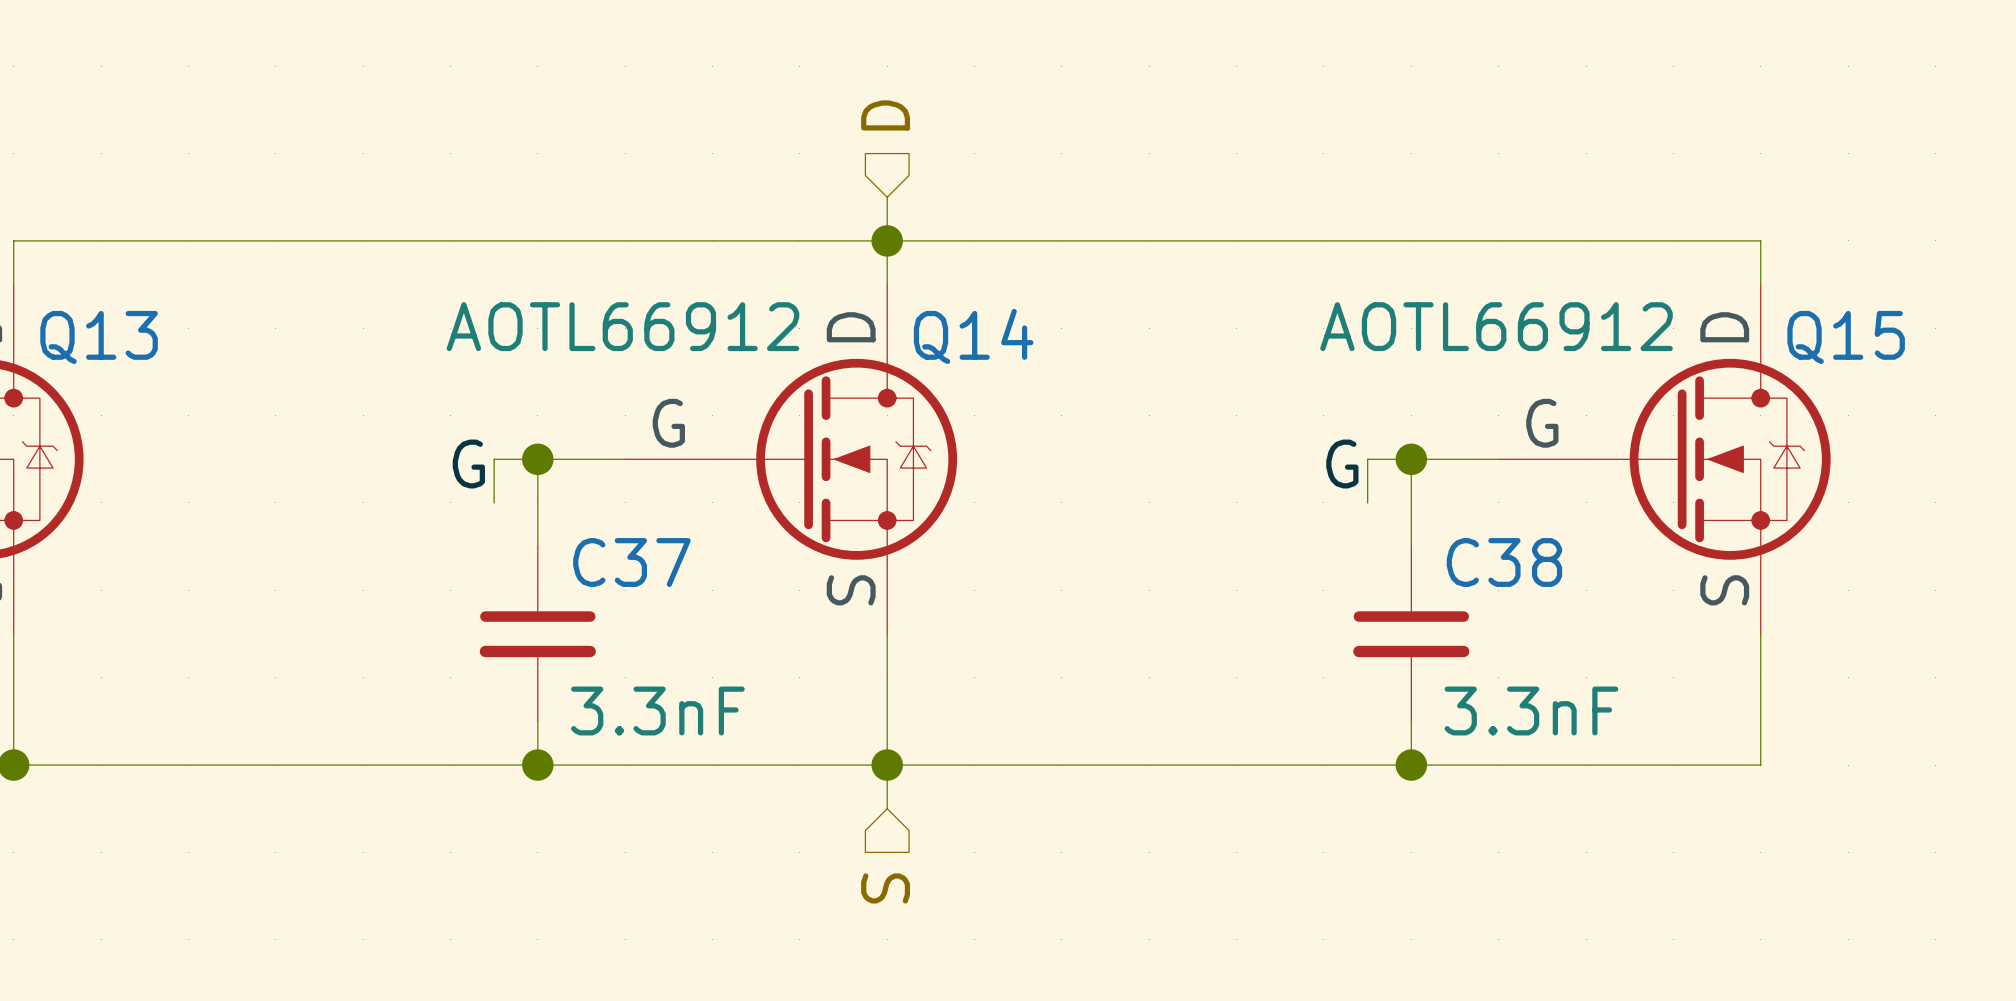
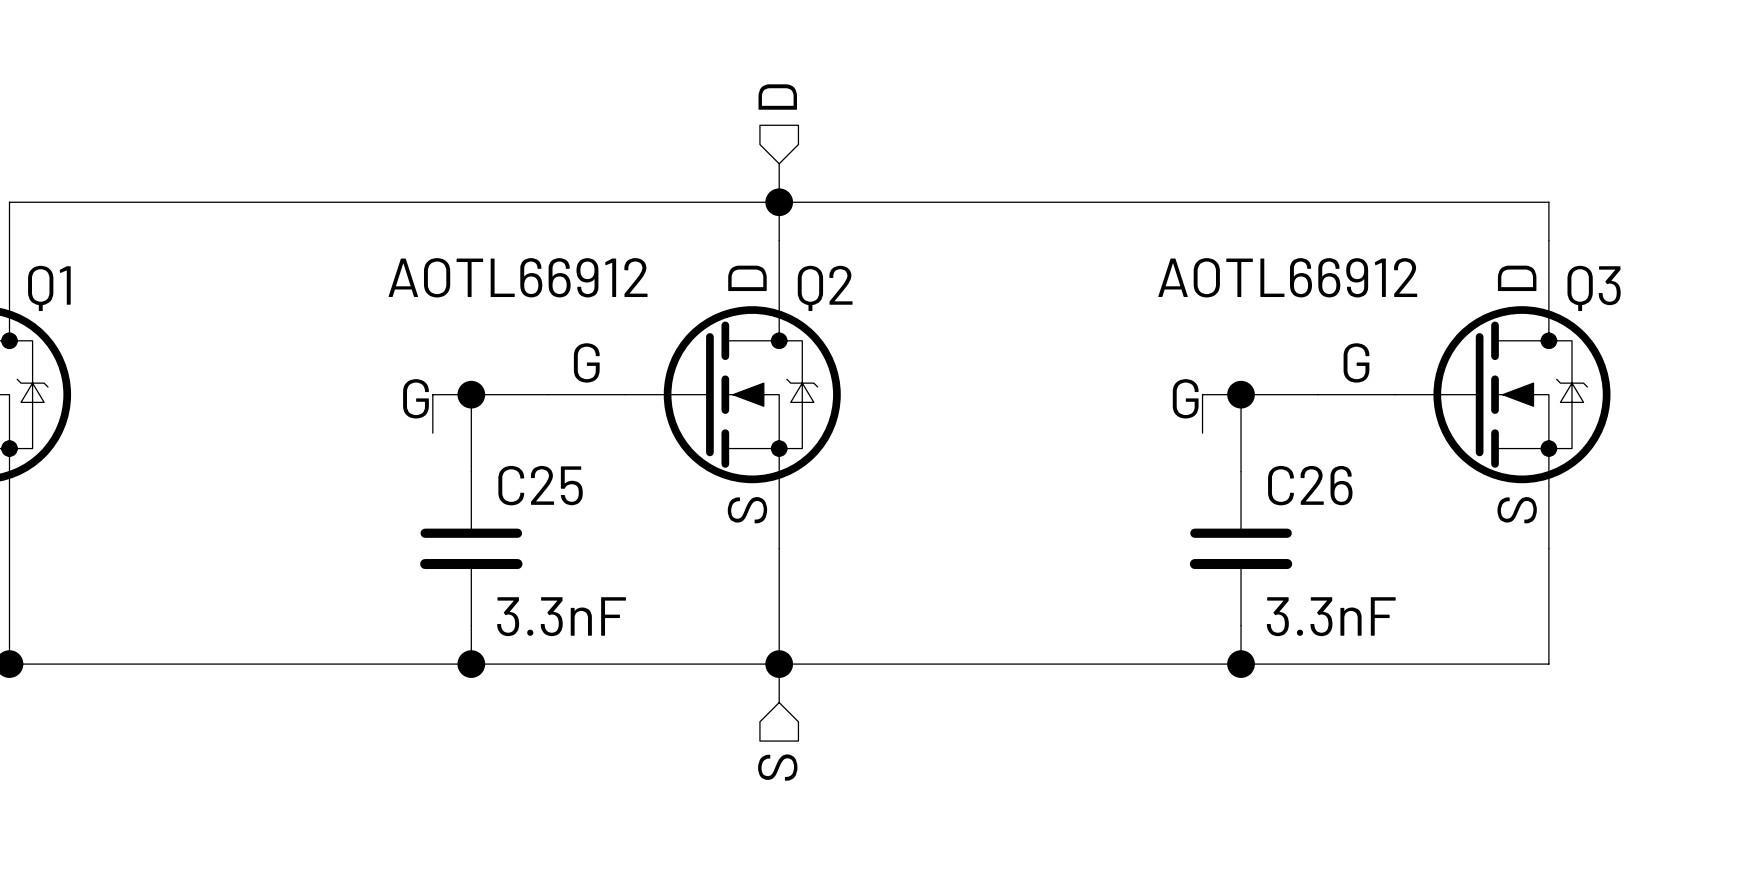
Q14 name: Q14 (973, 336) -> Q2 (825, 288)
Q13 name: Q13 (99, 337) -> Q1 (49, 288)
Q15 name: Q15 (1846, 337) -> Q3 (1594, 288)
C37 name: C37 (631, 562) -> C25 (540, 485)
C38 name: C38 (1504, 562) -> C26 (1310, 485)

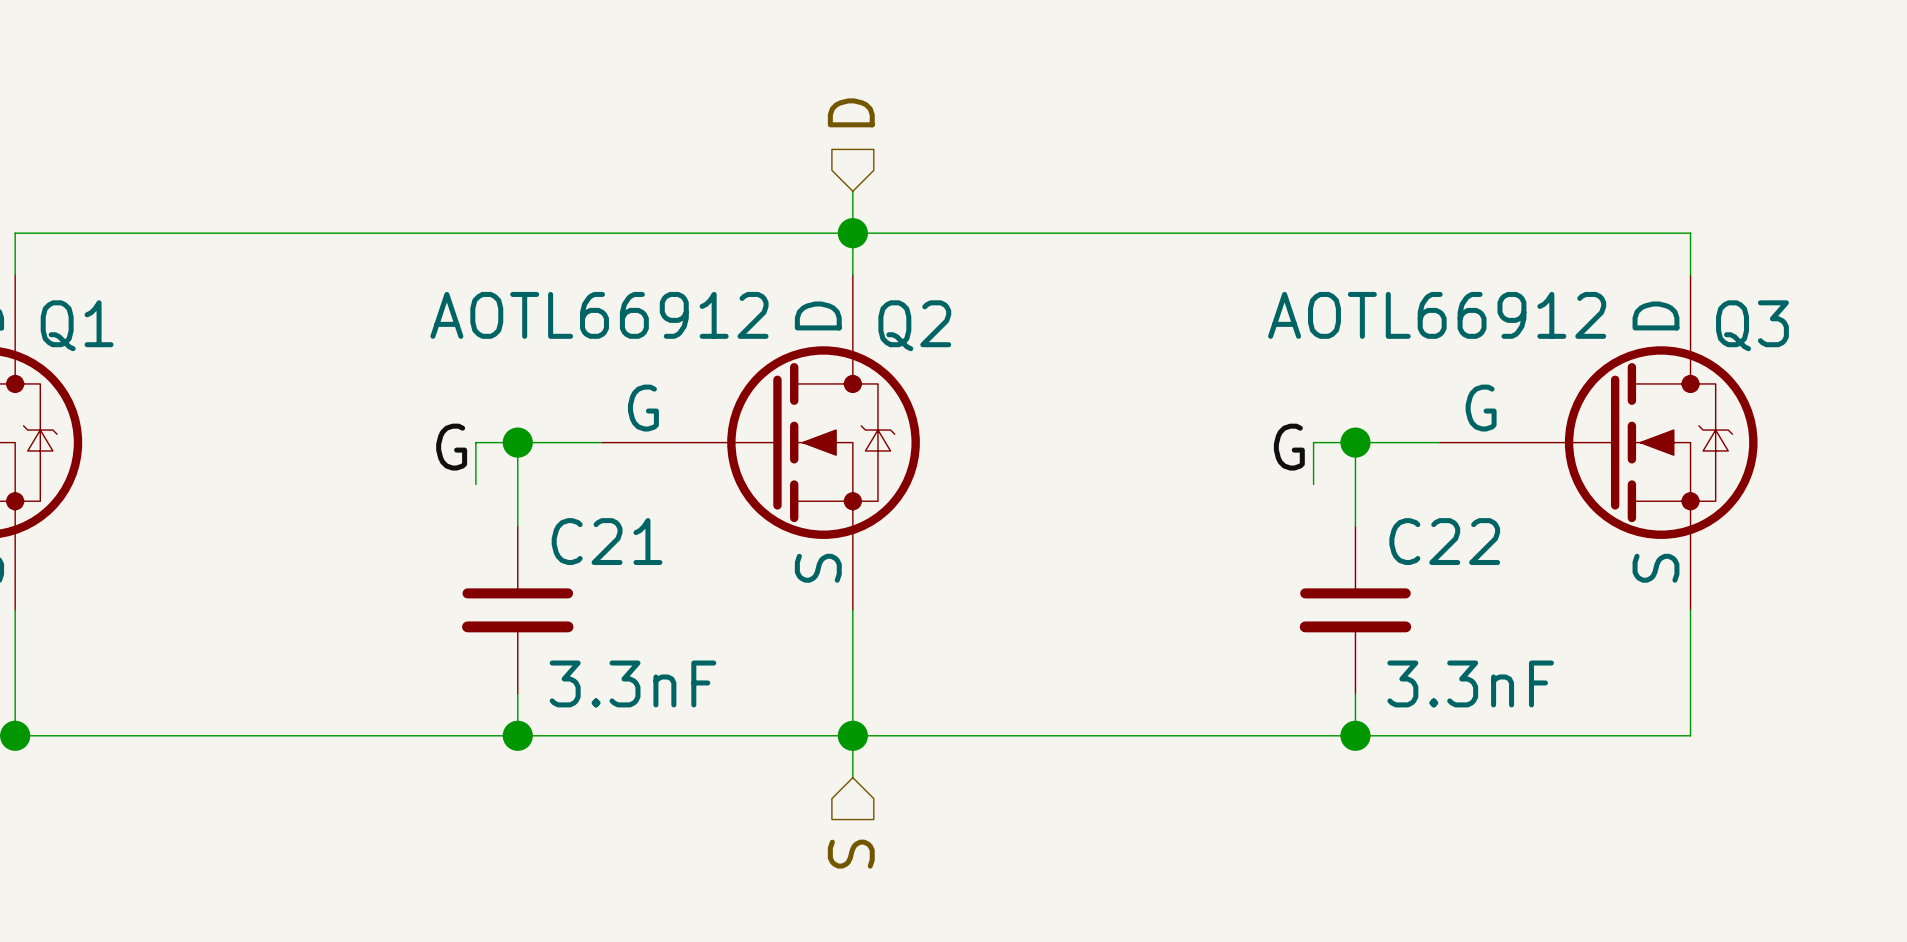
C25 name: C25 (540, 485) -> C21 (607, 541)
C26 name: C26 (1310, 485) -> C22 (1444, 541)

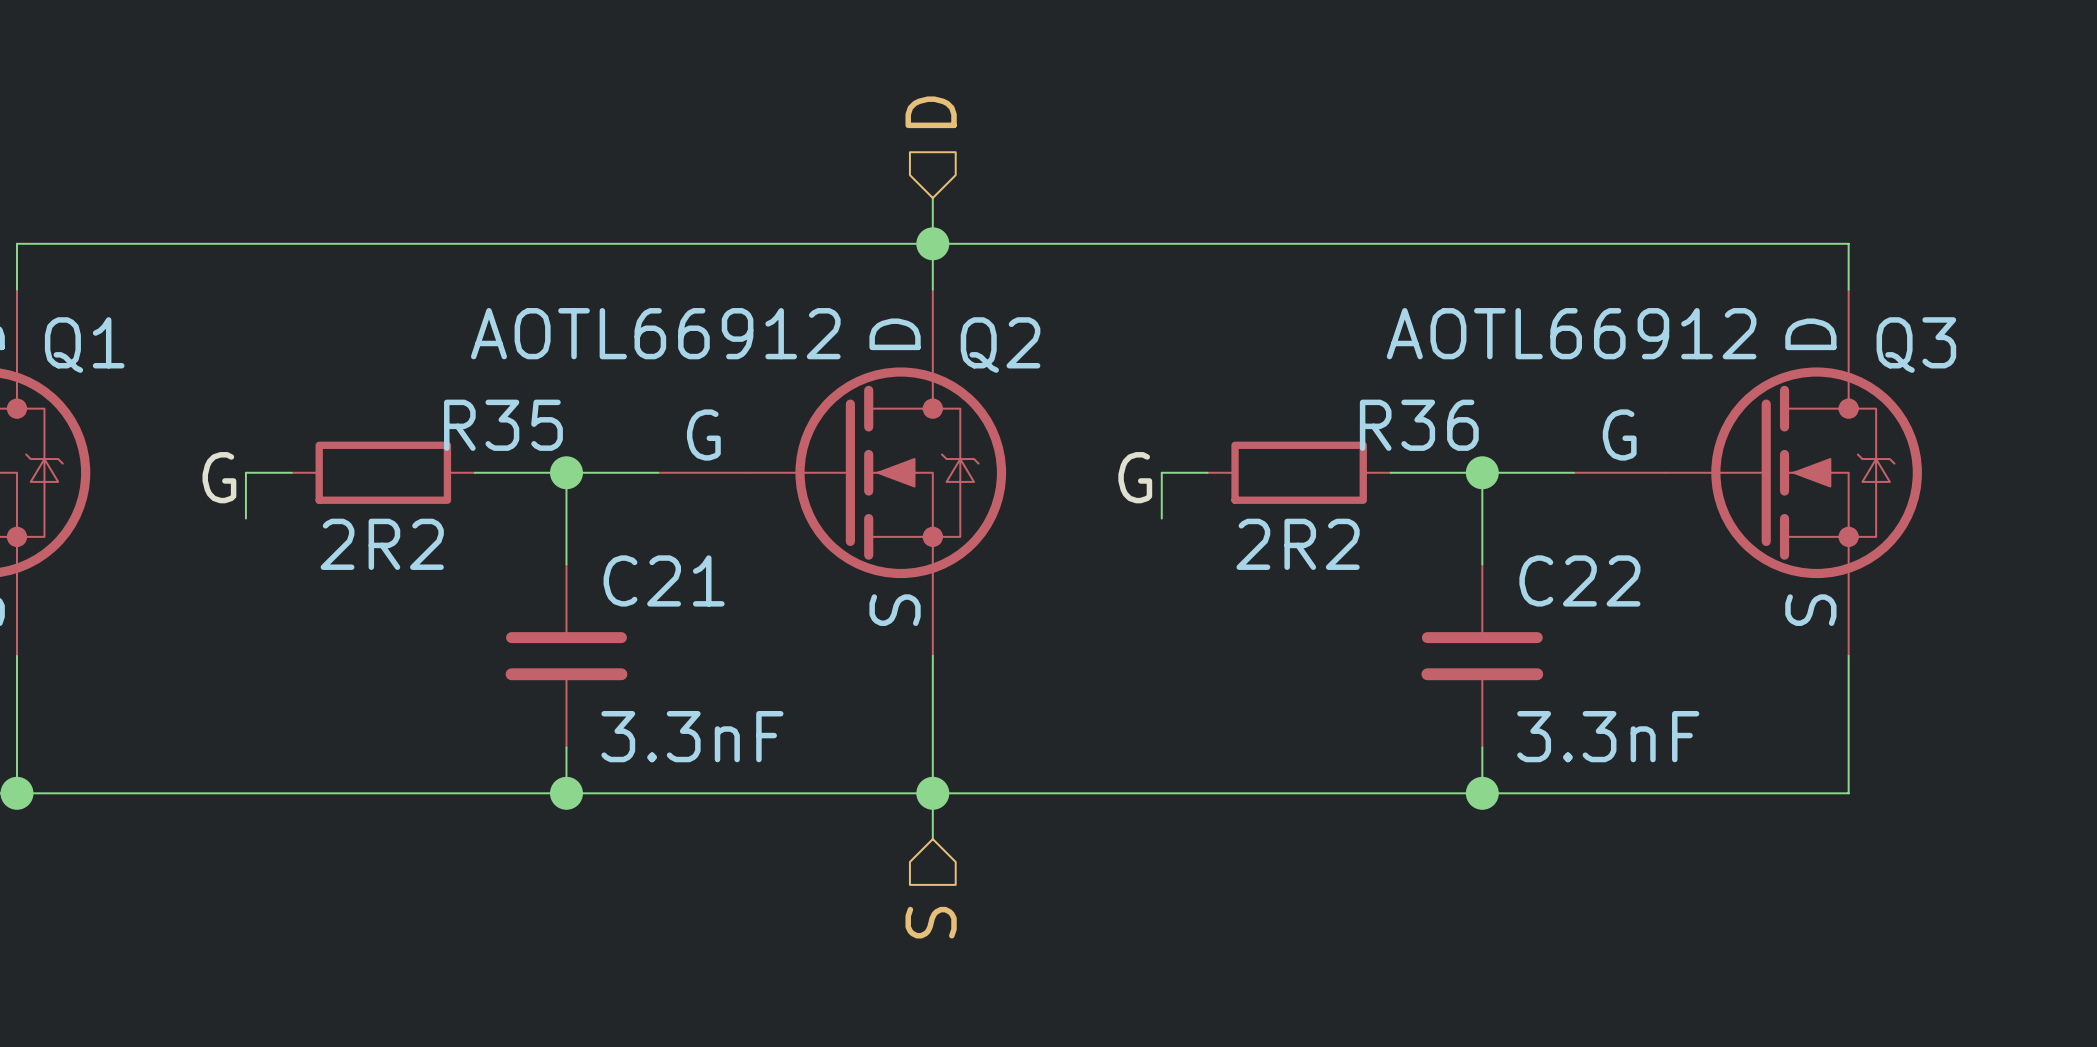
wire: none -> (291, 472) (245, 472) (245, 518)
R35: none -> 2R2 (383, 472)
wire: (475, 442) (475, 484) -> (520, 472) (474, 472)
wire: none -> (1207, 472) (1161, 472) (1161, 518)
R36: none -> 2R2 (1299, 472)
wire: (1313, 442) (1313, 484) -> (1436, 472) (1390, 472)
label position: G (451, 447) -> G (219, 477)
label position: G (1289, 447) -> G (1135, 477)

